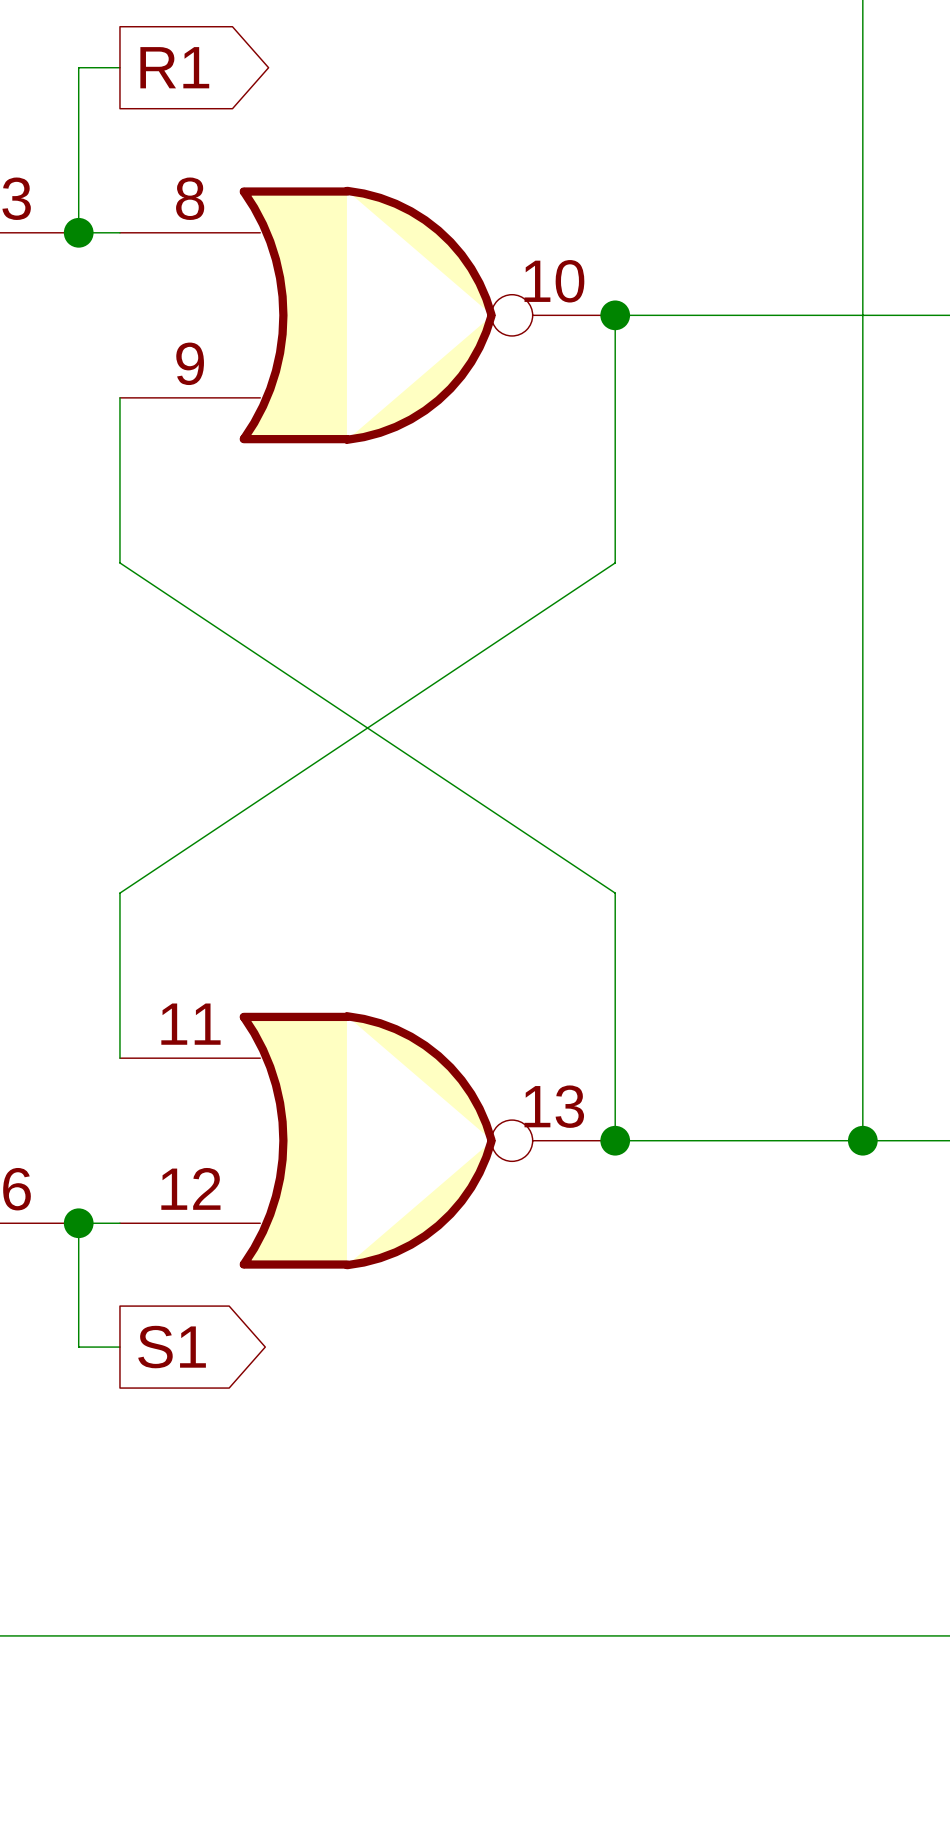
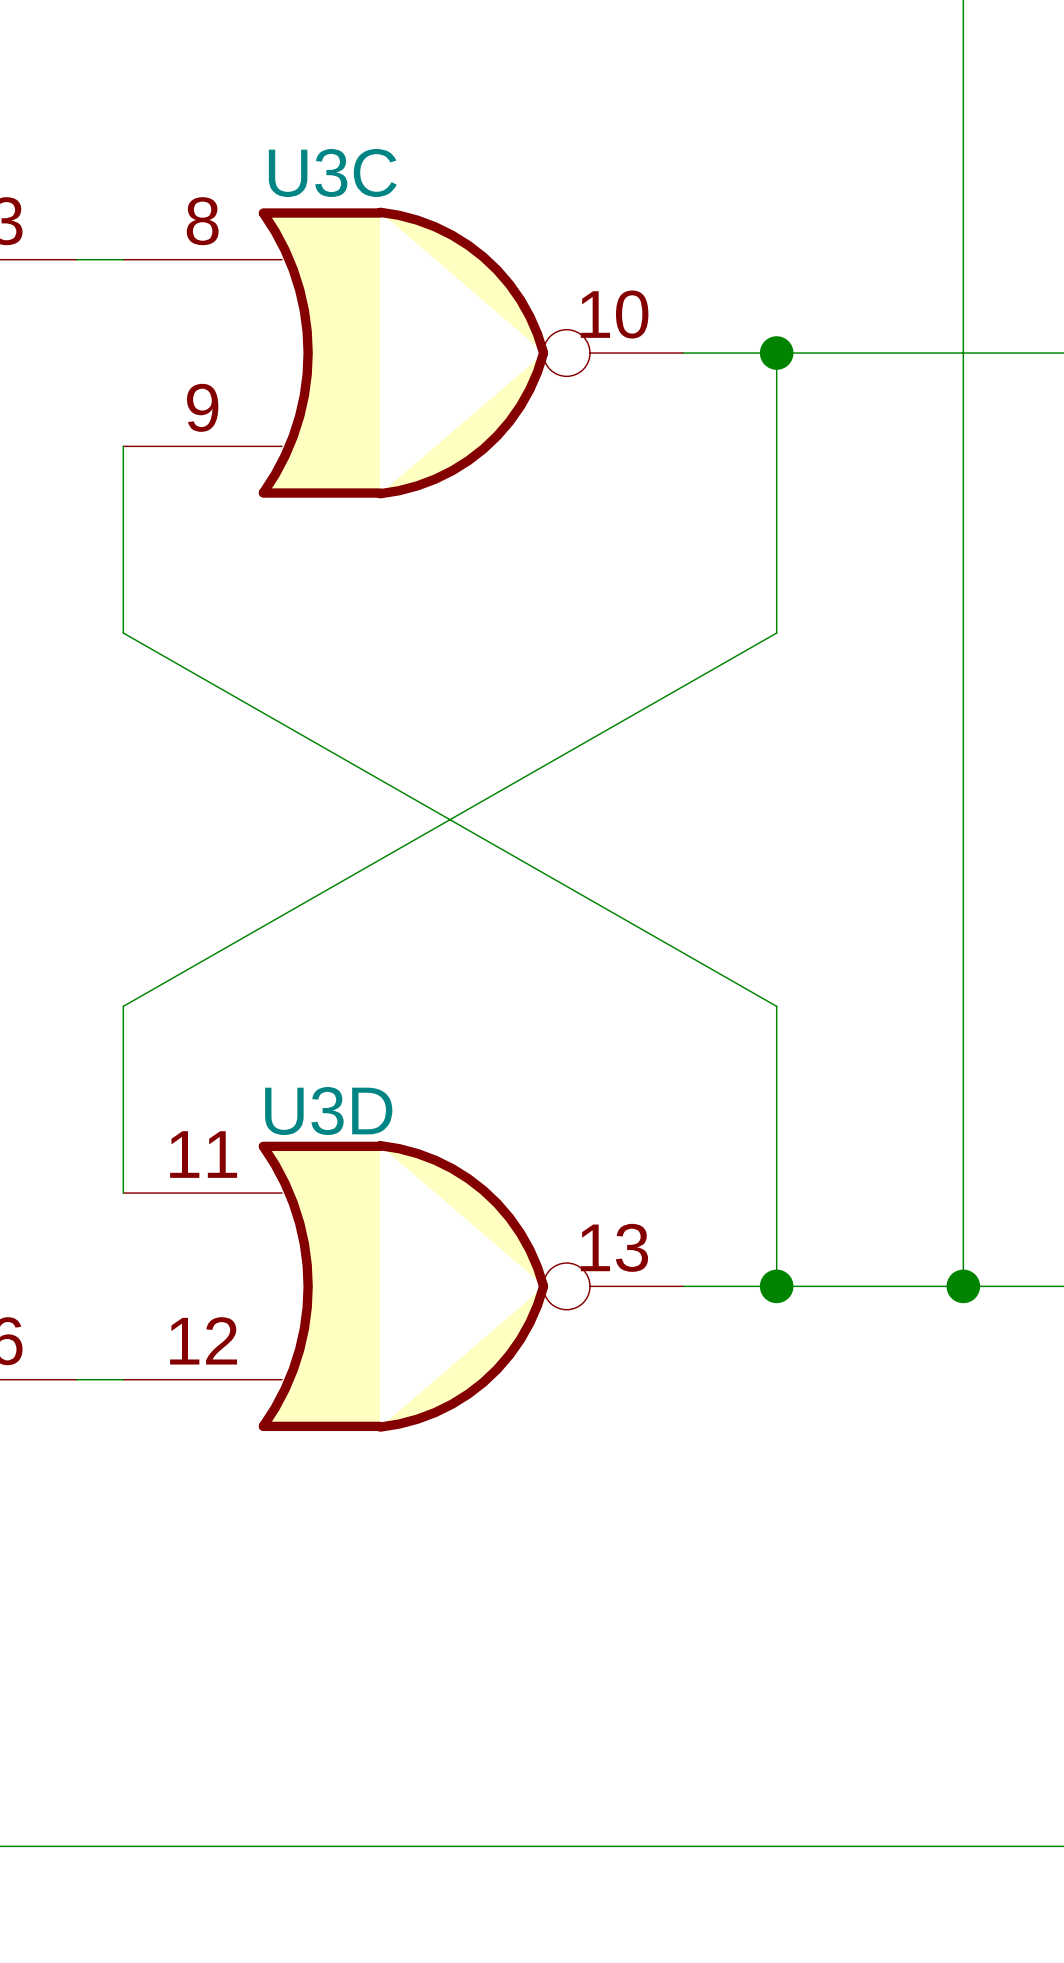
wire: (119, 67) (78, 67) (78, 232) -> none
global label: R1 (174, 67) -> none
U3C name: none -> U3C (332, 172)
junction: (78, 232) -> none
wire: (615, 315) (615, 562) (119, 893) -> (776, 353) (776, 633) (123, 1006)
junction position: (615, 315) -> (776, 353)
wire: (119, 562) (615, 893) (615, 1140) -> (123, 633) (776, 1006) (776, 1286)
U3D name: none -> U3D (328, 1111)
junction position: (615, 1140) -> (776, 1286)
wire: (78, 1223) (78, 1347) (119, 1347) -> none
junction: (78, 1223) -> none
global label: S1 (172, 1347) -> none

